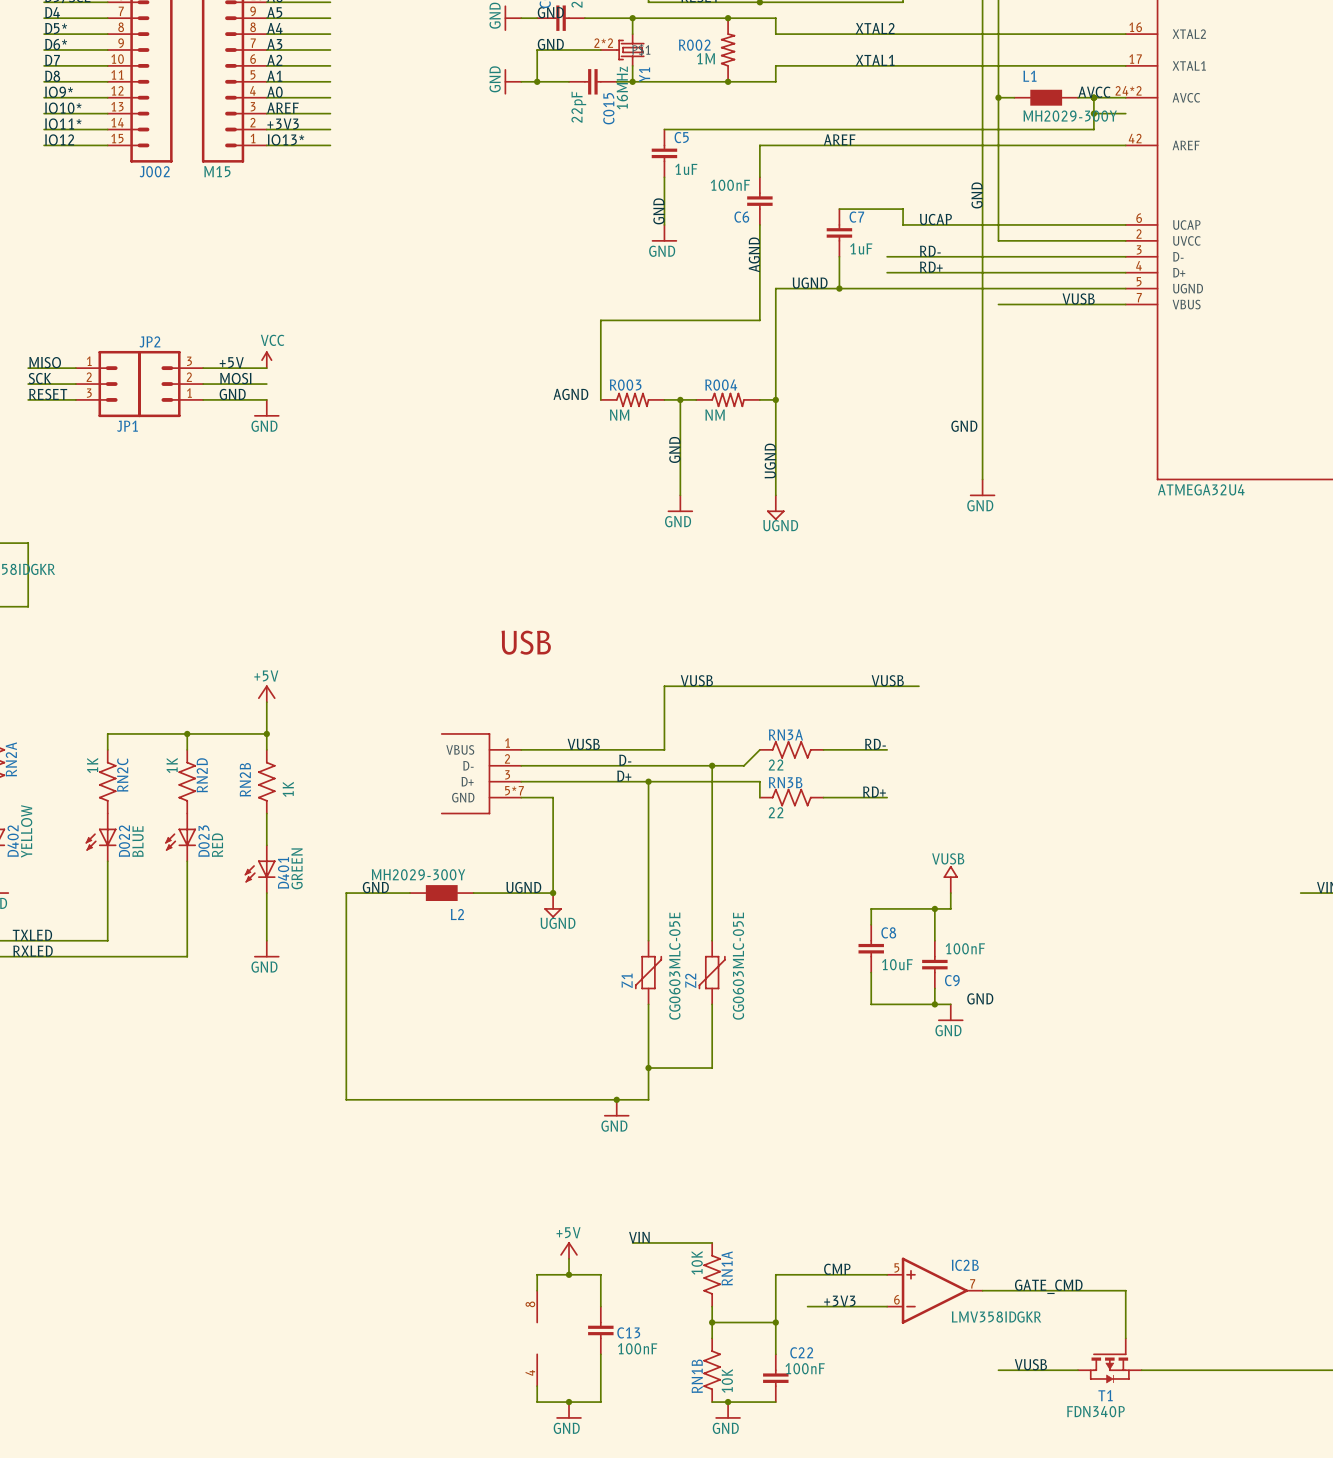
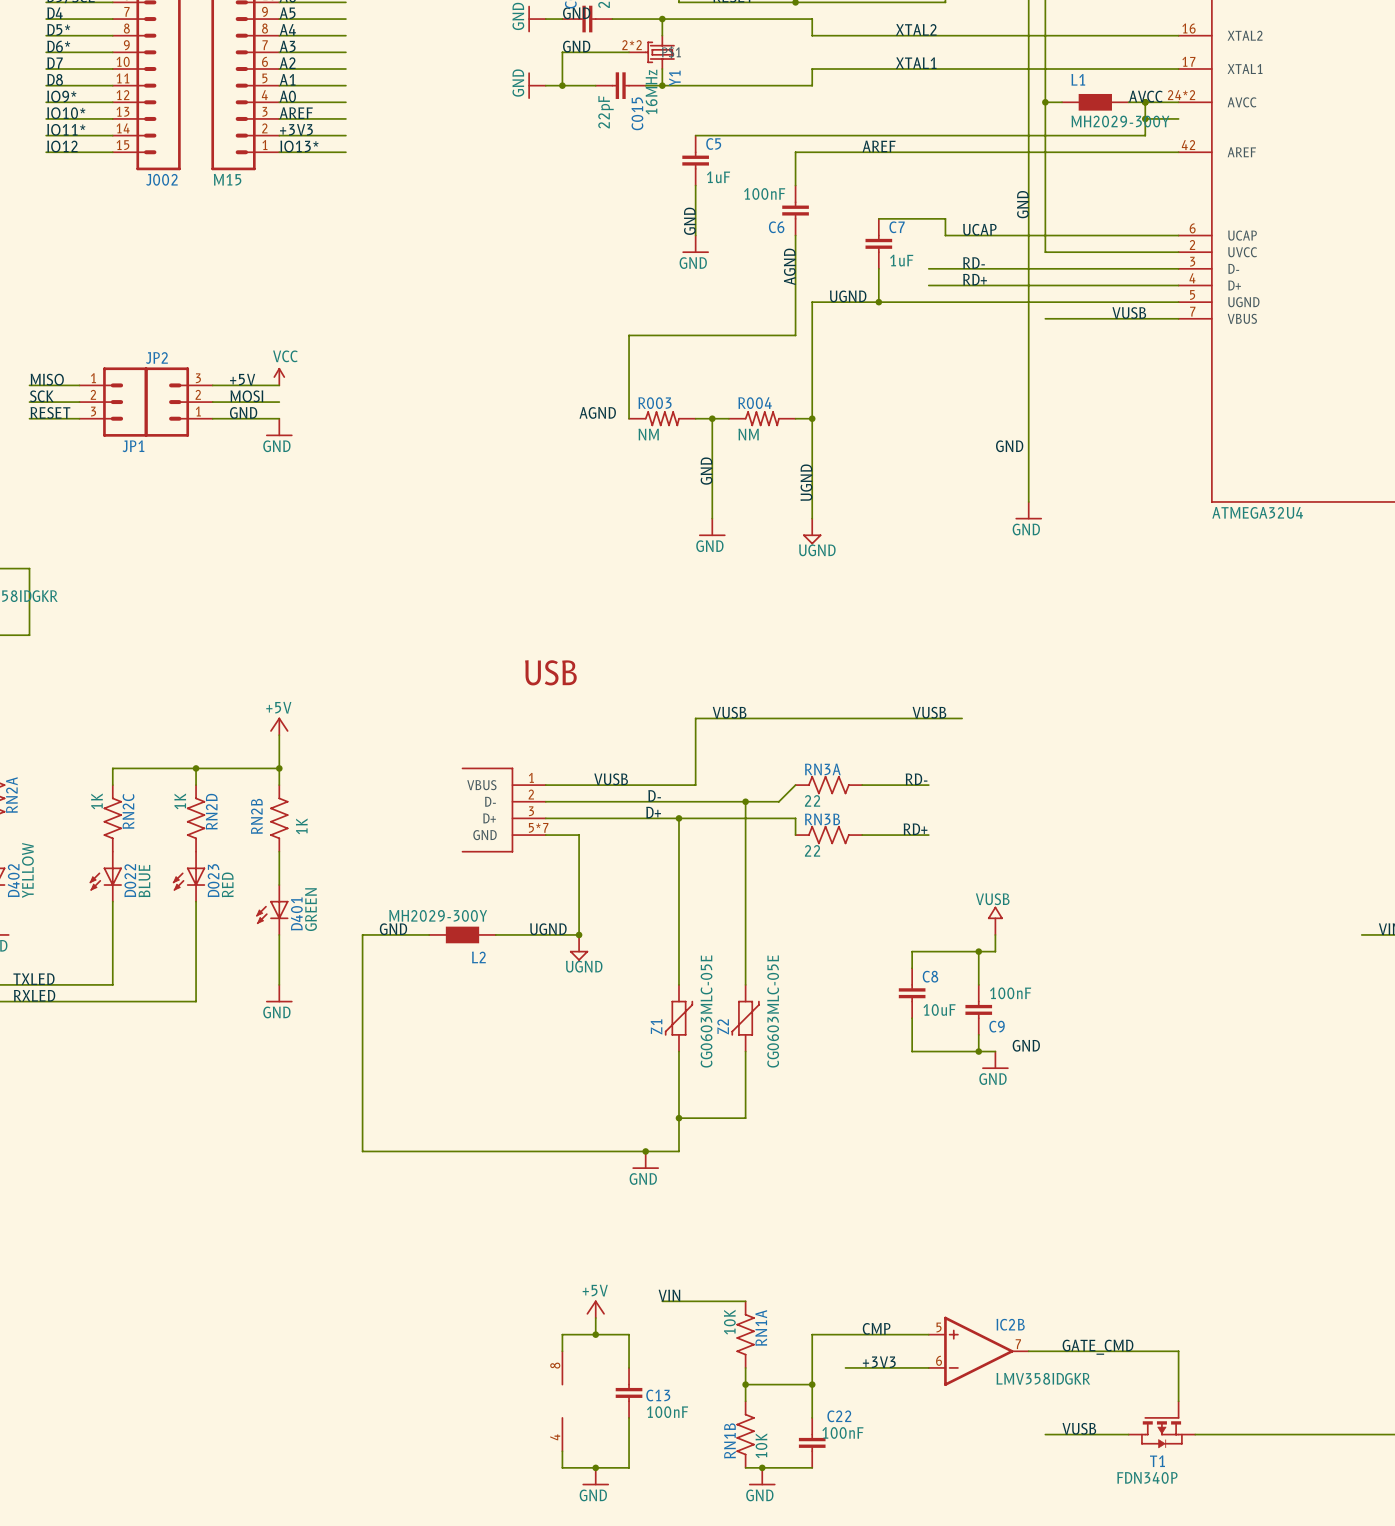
junction: (728, 18) -> none
R002: 1M (728, 49) -> none
junction: (728, 81) -> none

